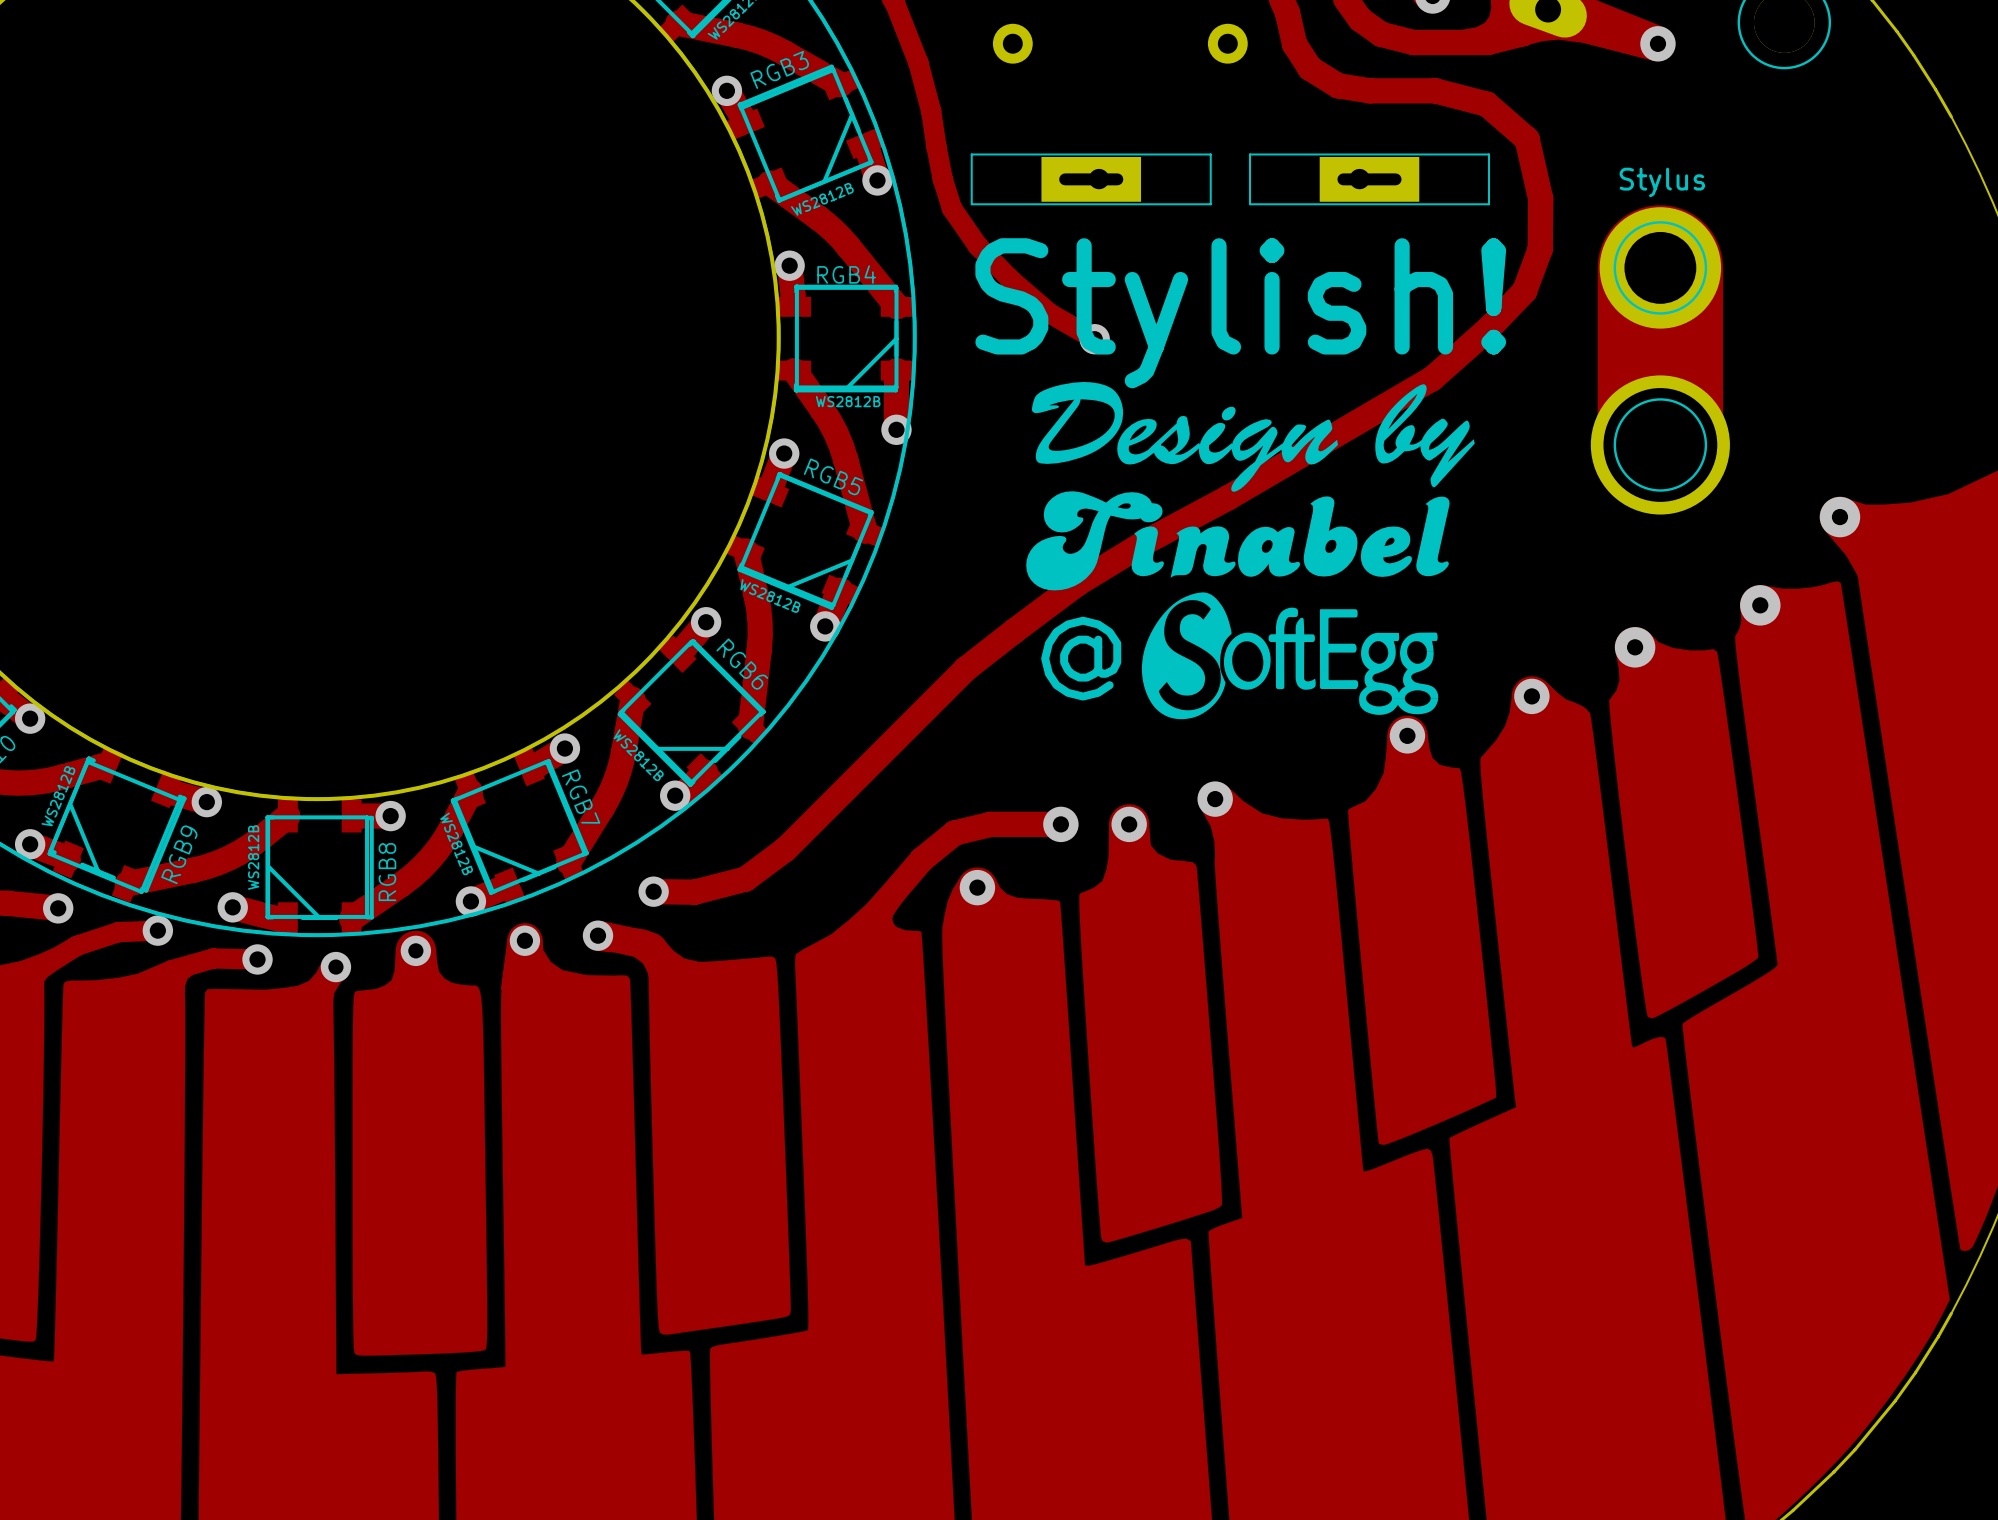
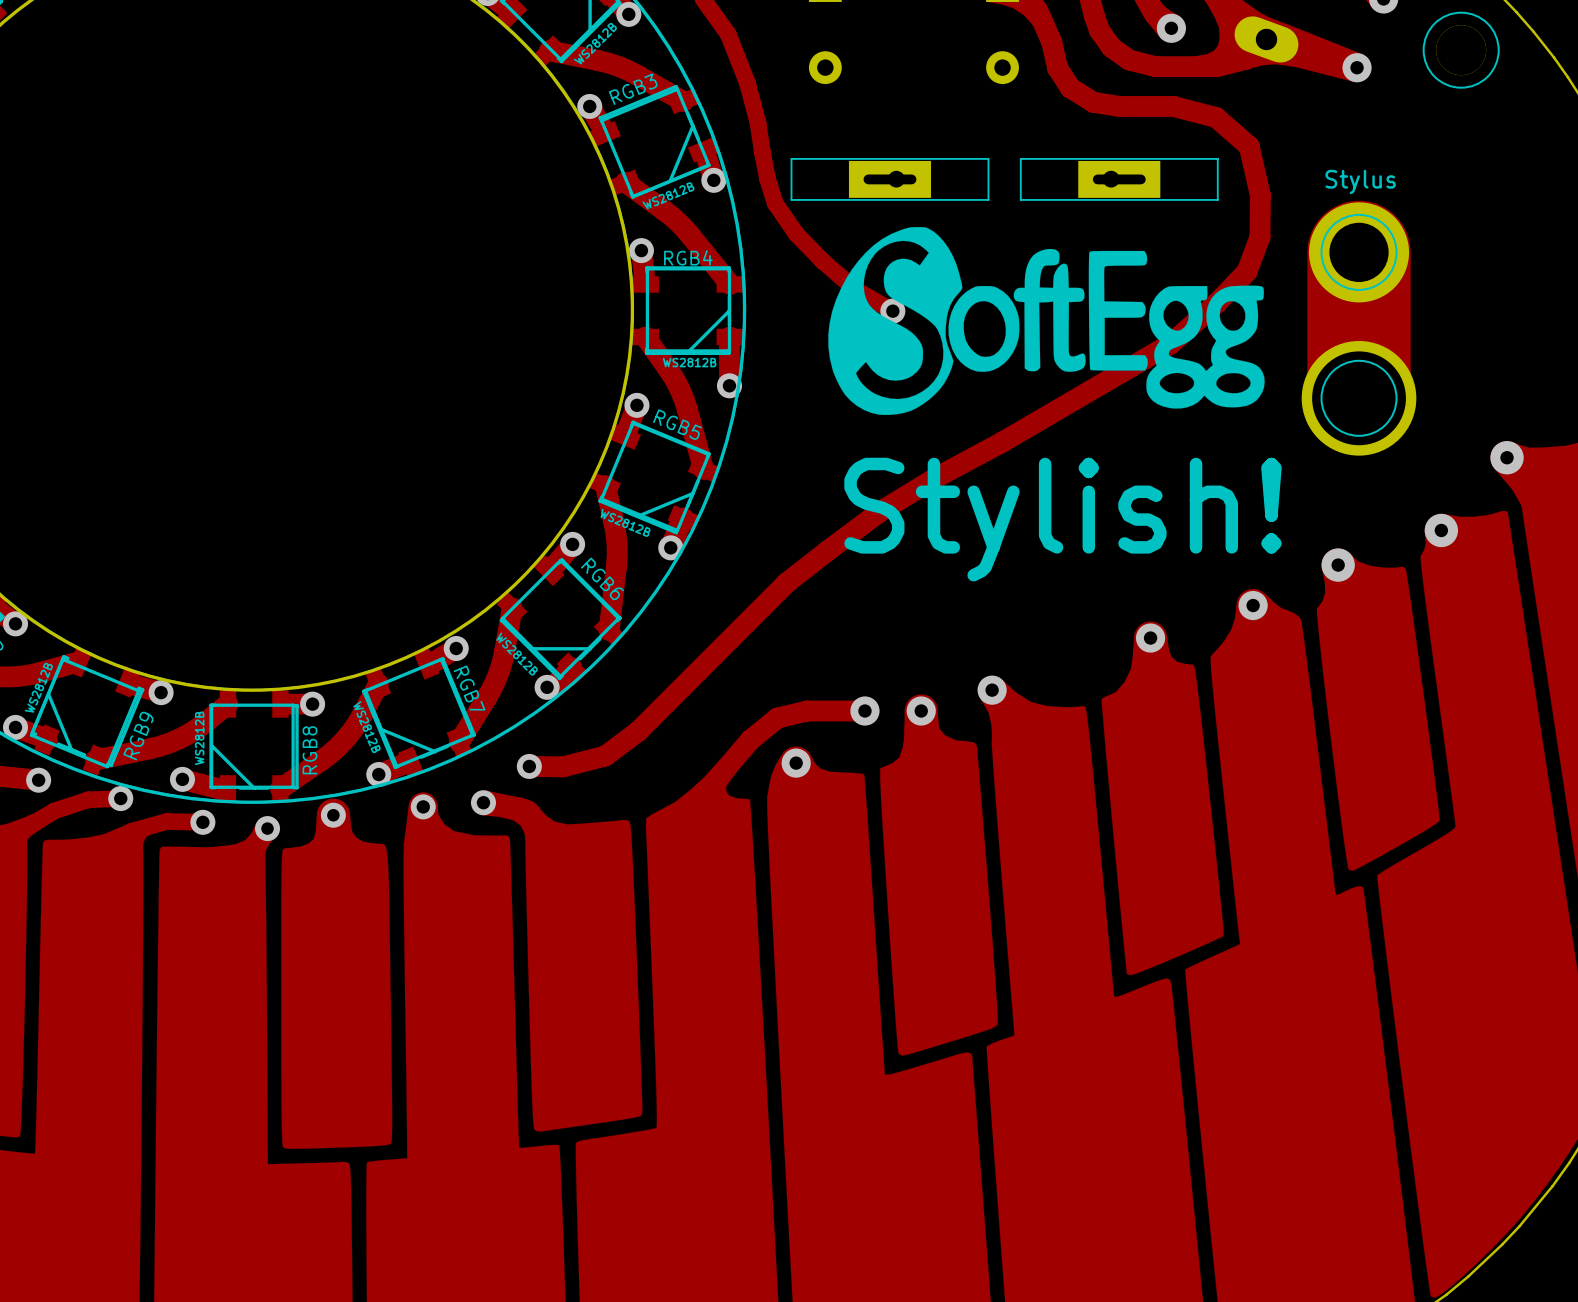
drawing: none -> [828, 227, 1265, 415]
text position: Stylish! (1240, 313) -> Stylish! (1063, 519)
drawing: [1026, 381, 1475, 720] -> none
text: @ (1081, 658) -> none

